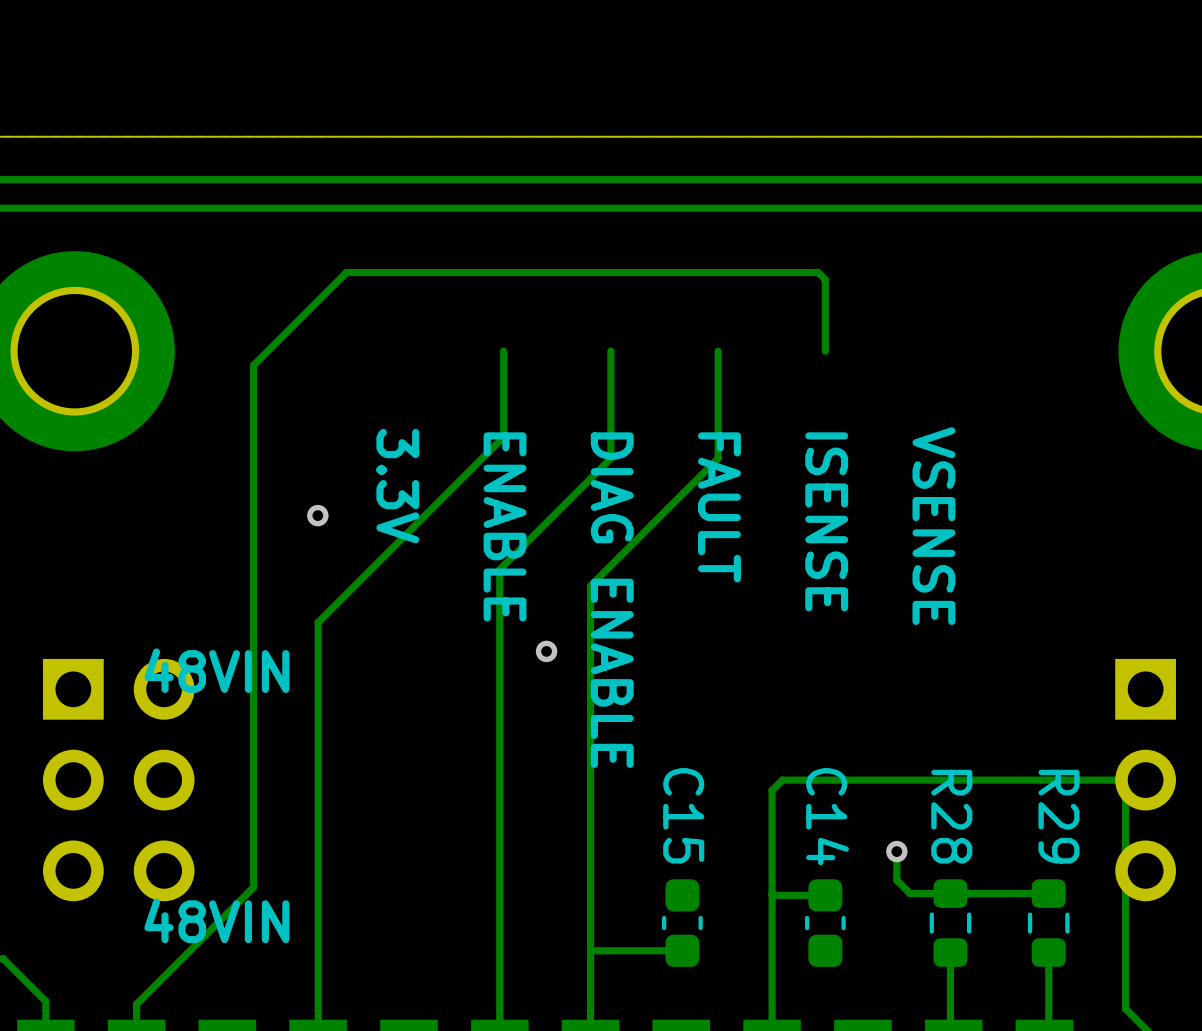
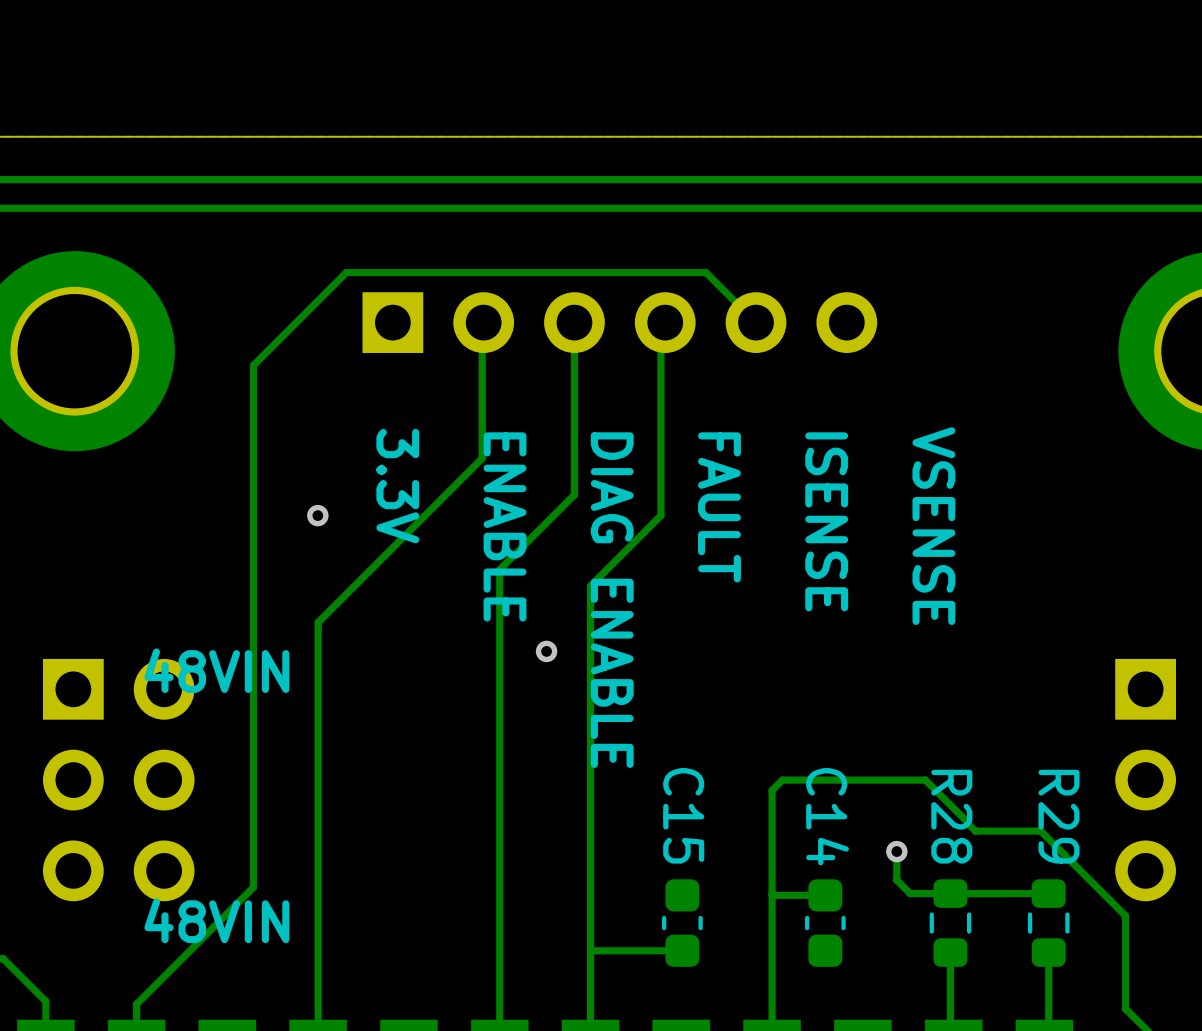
track: (705, 272) (818, 272) (825, 279) (825, 351) -> (705, 272) (756, 322)
part: none -> (619, 322)
track: (503, 351) (503, 436) (482, 458) -> (483, 322) (482, 458)
track: (610, 351) (610, 458) (574, 494) -> (574, 322) (574, 494)
track: (718, 351) (718, 458) (660, 515) -> (665, 322) (660, 326) (660, 515)
track: (925, 780) (1118, 780) (1125, 787) (1125, 915) -> (925, 780) (975, 831) (1040, 831) (1125, 915)

